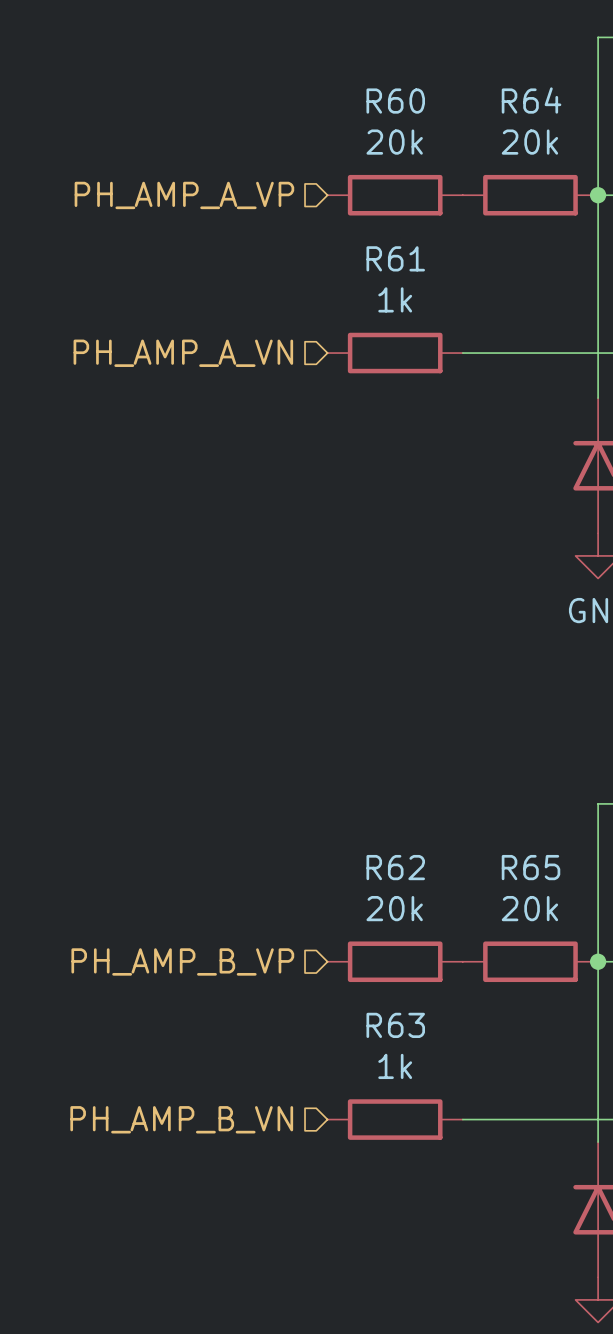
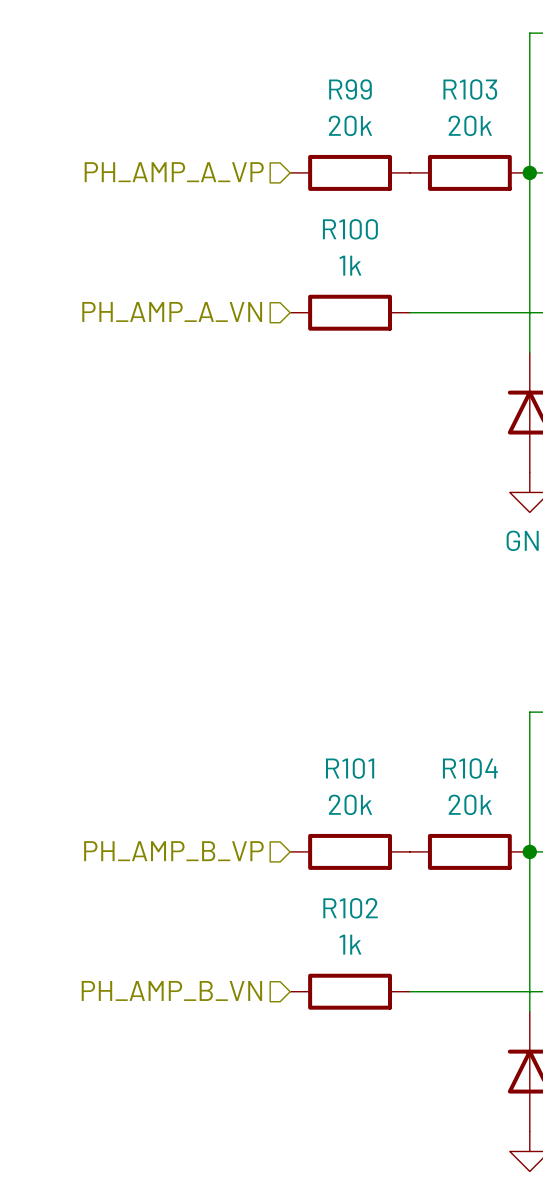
R64 name: R64 (531, 100) -> R103 (470, 89)
R60 name: R60 (395, 101) -> R99 (350, 89)
R61 name: R61 (395, 258) -> R100 (350, 229)
R62 name: R62 (395, 867) -> R101 (350, 768)
R65 name: R65 (531, 867) -> R104 (470, 768)
R63 name: R63 (395, 1025) -> R102 (350, 908)

